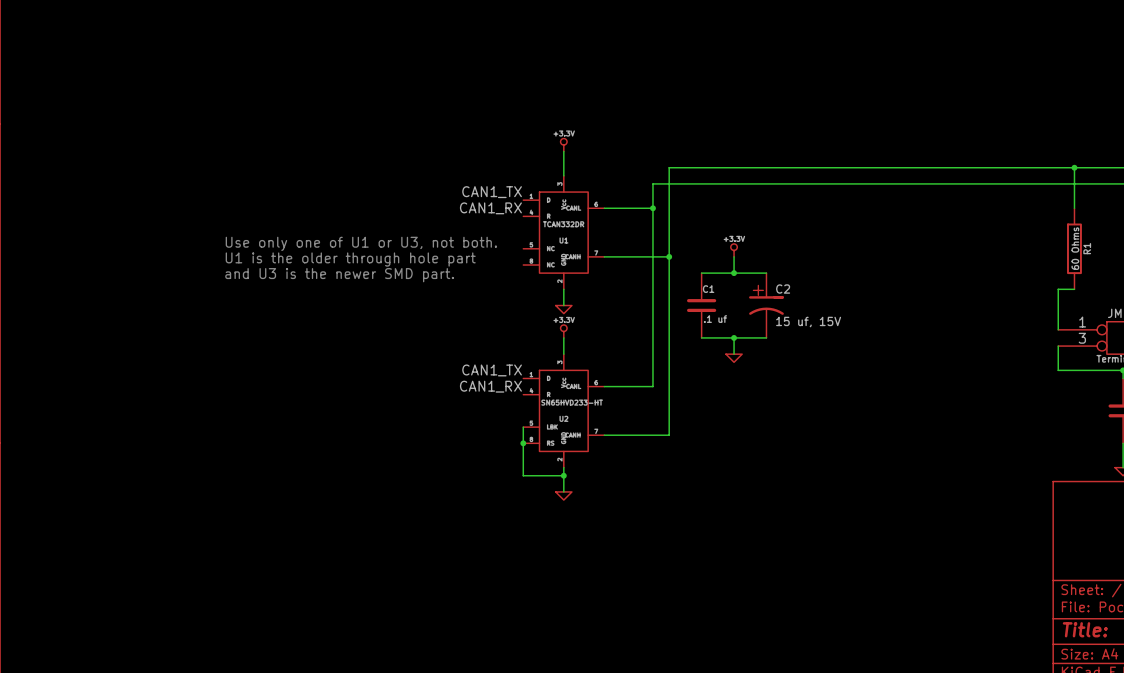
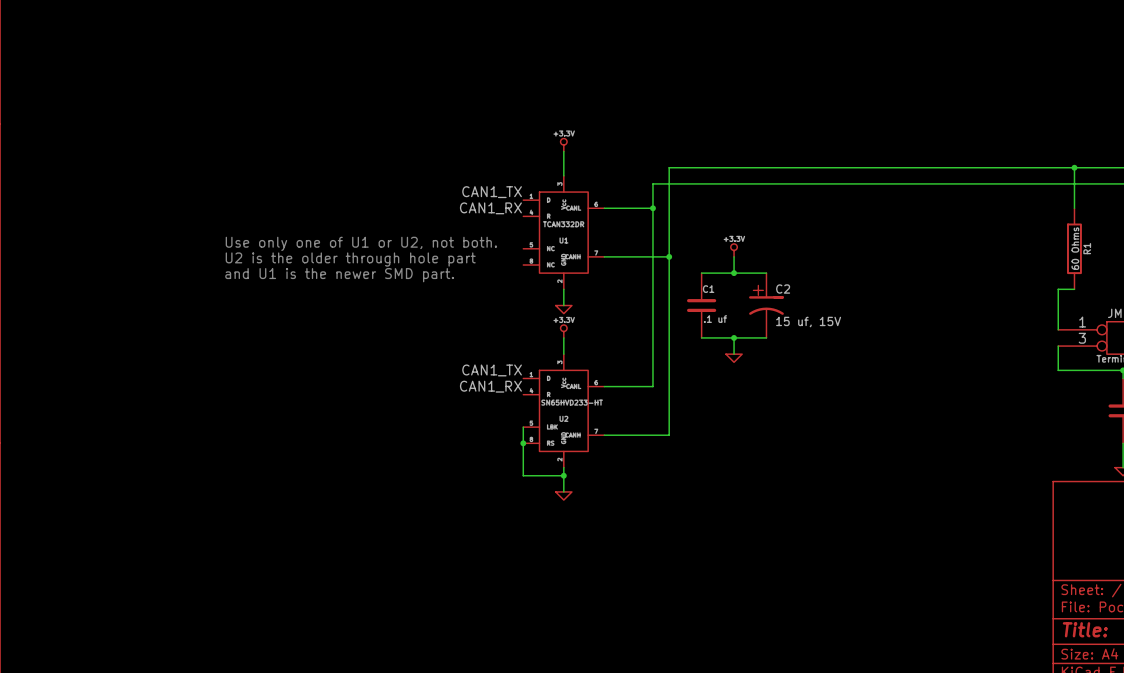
text: Use only one of U1 or U3, not both. (361, 243) -> Use only one of U1 or U2, not both. (361, 243)
text: U1 is the older through hole part (350, 259) -> U2 is the older through hole part (350, 259)
text: and U3 is the newer SMD part. (339, 275) -> and U1 is the newer SMD part. (339, 275)

